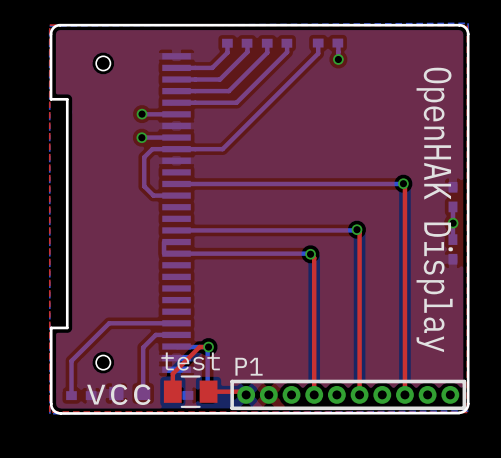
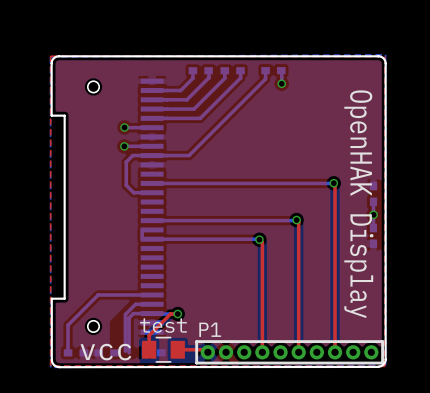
bottom track: none -> (152, 313) (133, 313) (129, 317) (129, 352)
bottom track: (208, 347) (207, 395) -> none
part footprint: [109, 386, 151, 401] -> [94, 349, 119, 357]

